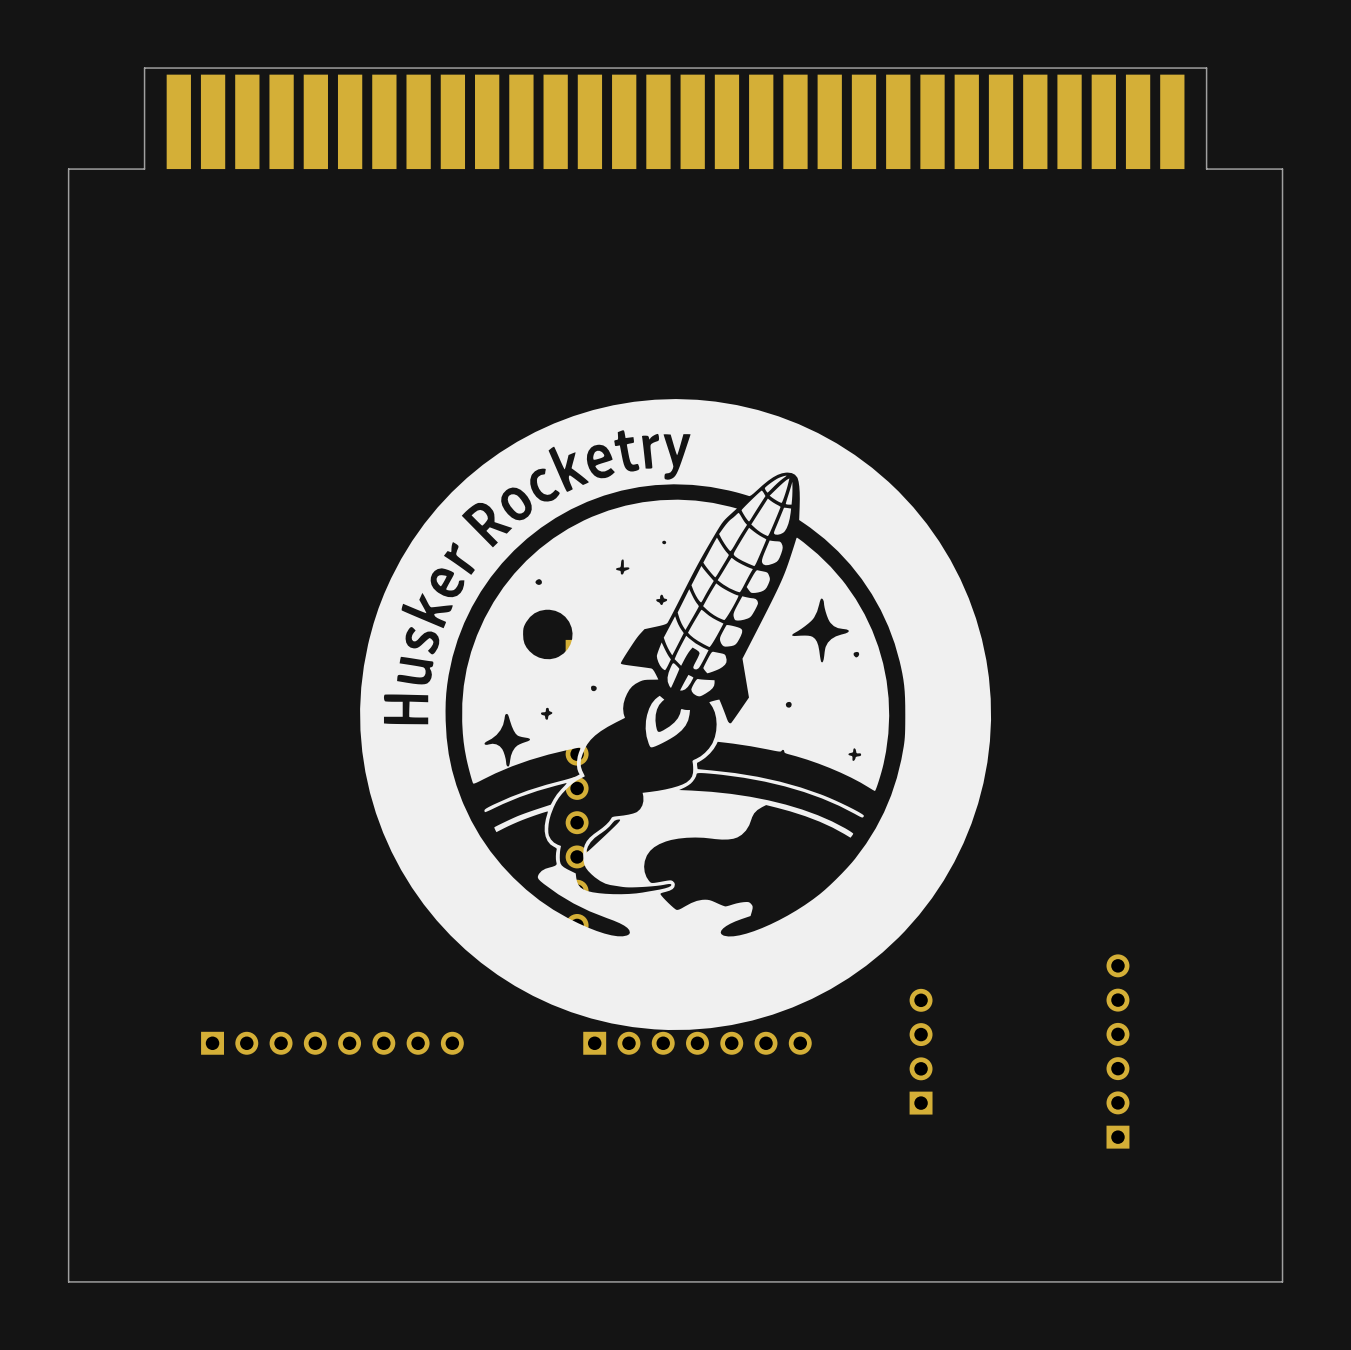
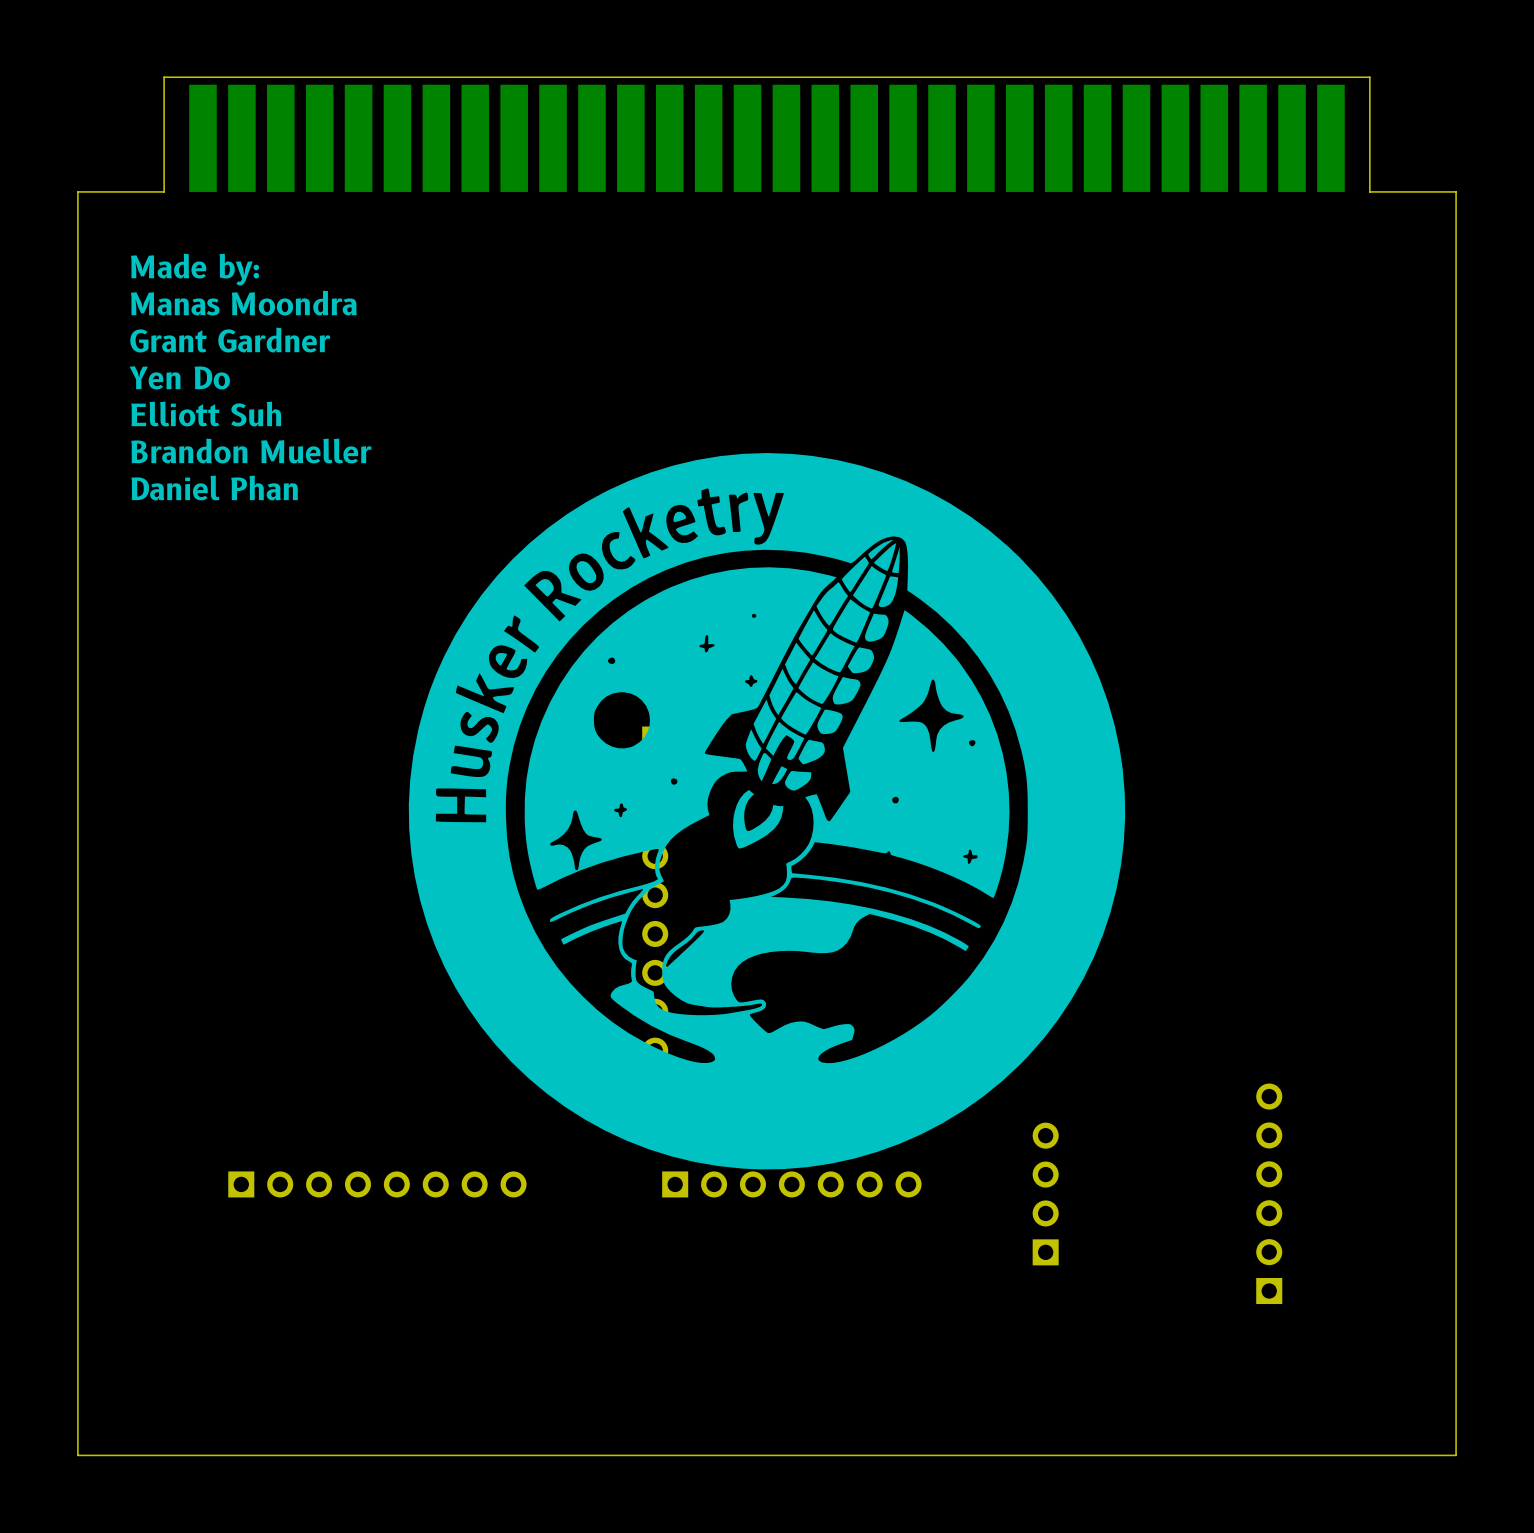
text: none -> Made by: (195, 269)
text: none -> Manas Moondra (243, 303)
text: none -> Grant Gardner (230, 340)
text: none -> Yen Do (179, 377)
text: none -> Elliott Suh (206, 414)
text: none -> Brandon Mueller (251, 451)
text: none -> Daniel Phan (214, 487)

